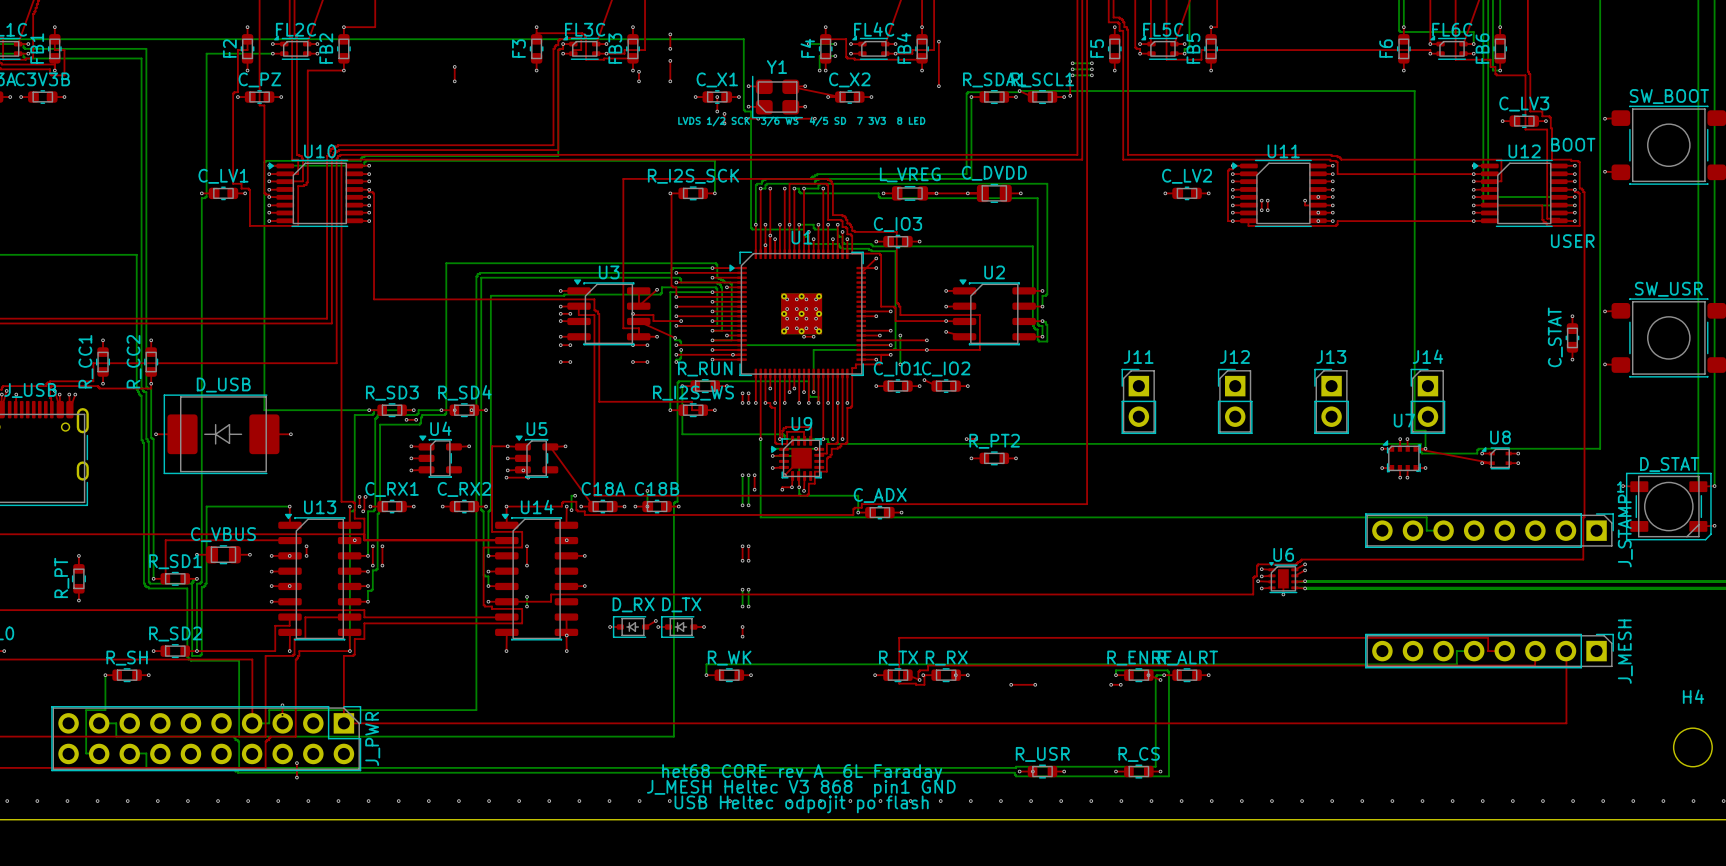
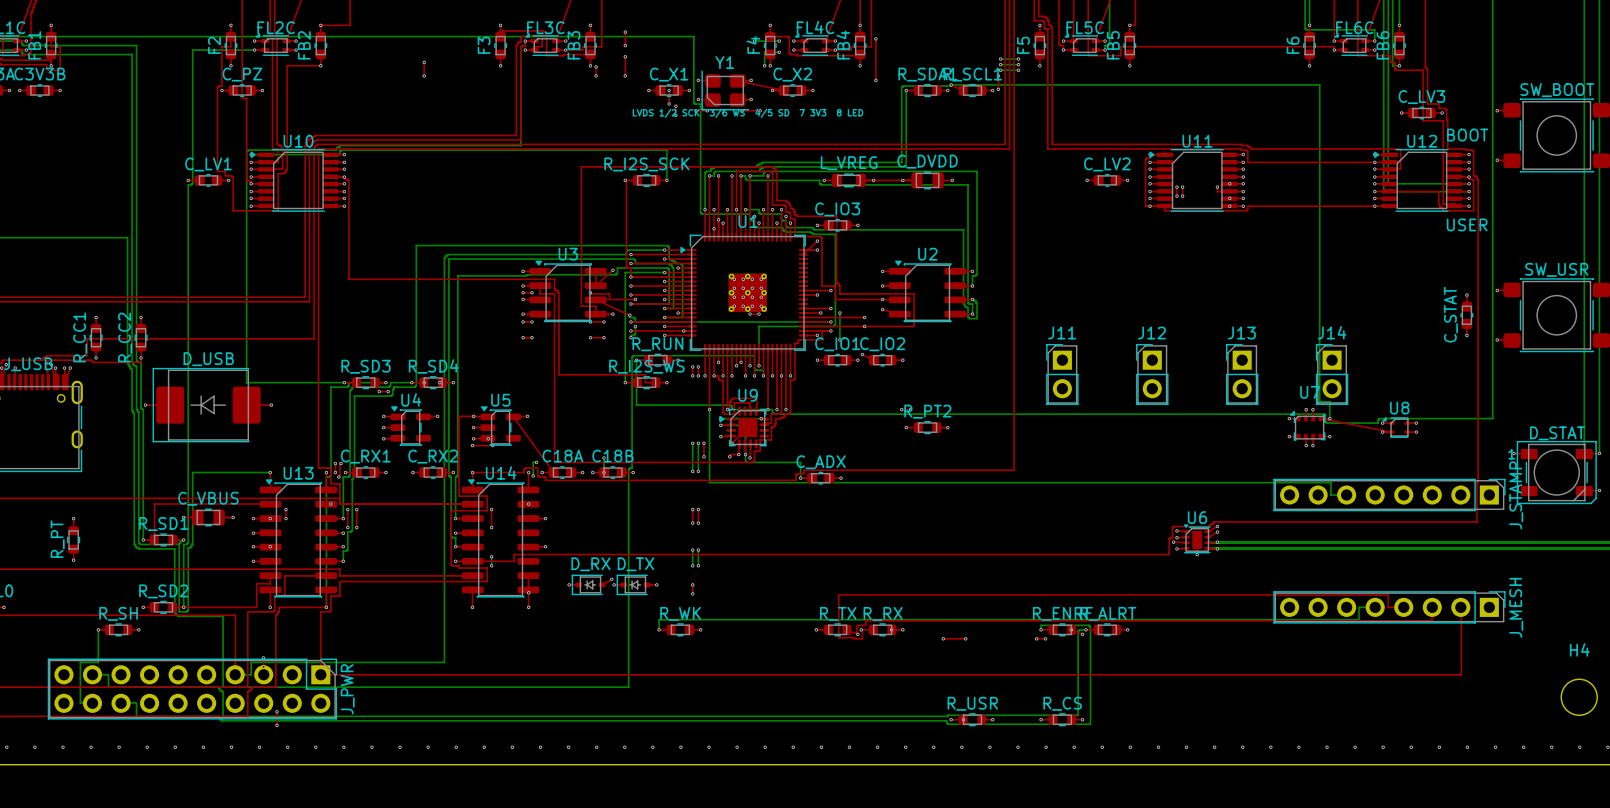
text: het68 CORE rev A 6L Faraday (802, 773) -> none
text: J_MESH Heltec V3 868 pin1 GND (801, 788) -> none
text: USB Heltec odpojit po flash (801, 804) -> none

